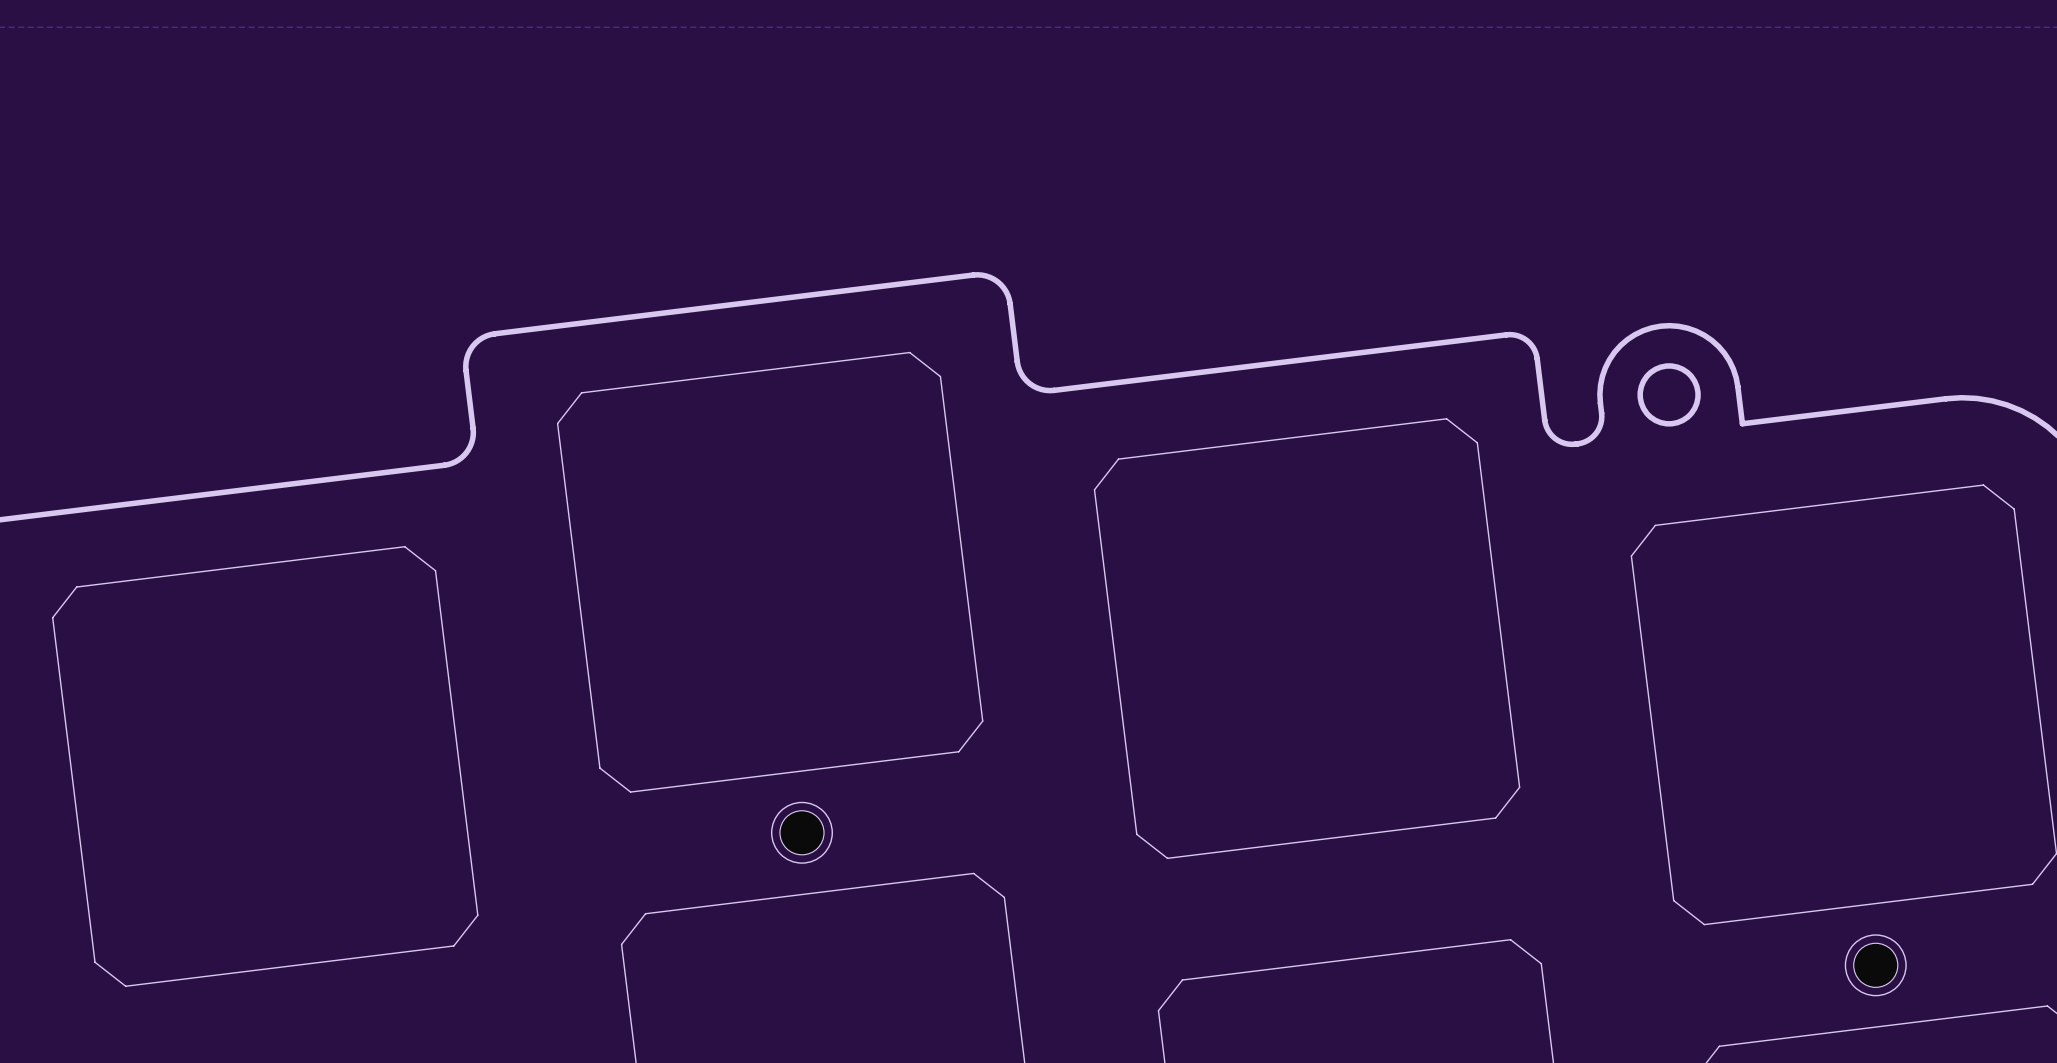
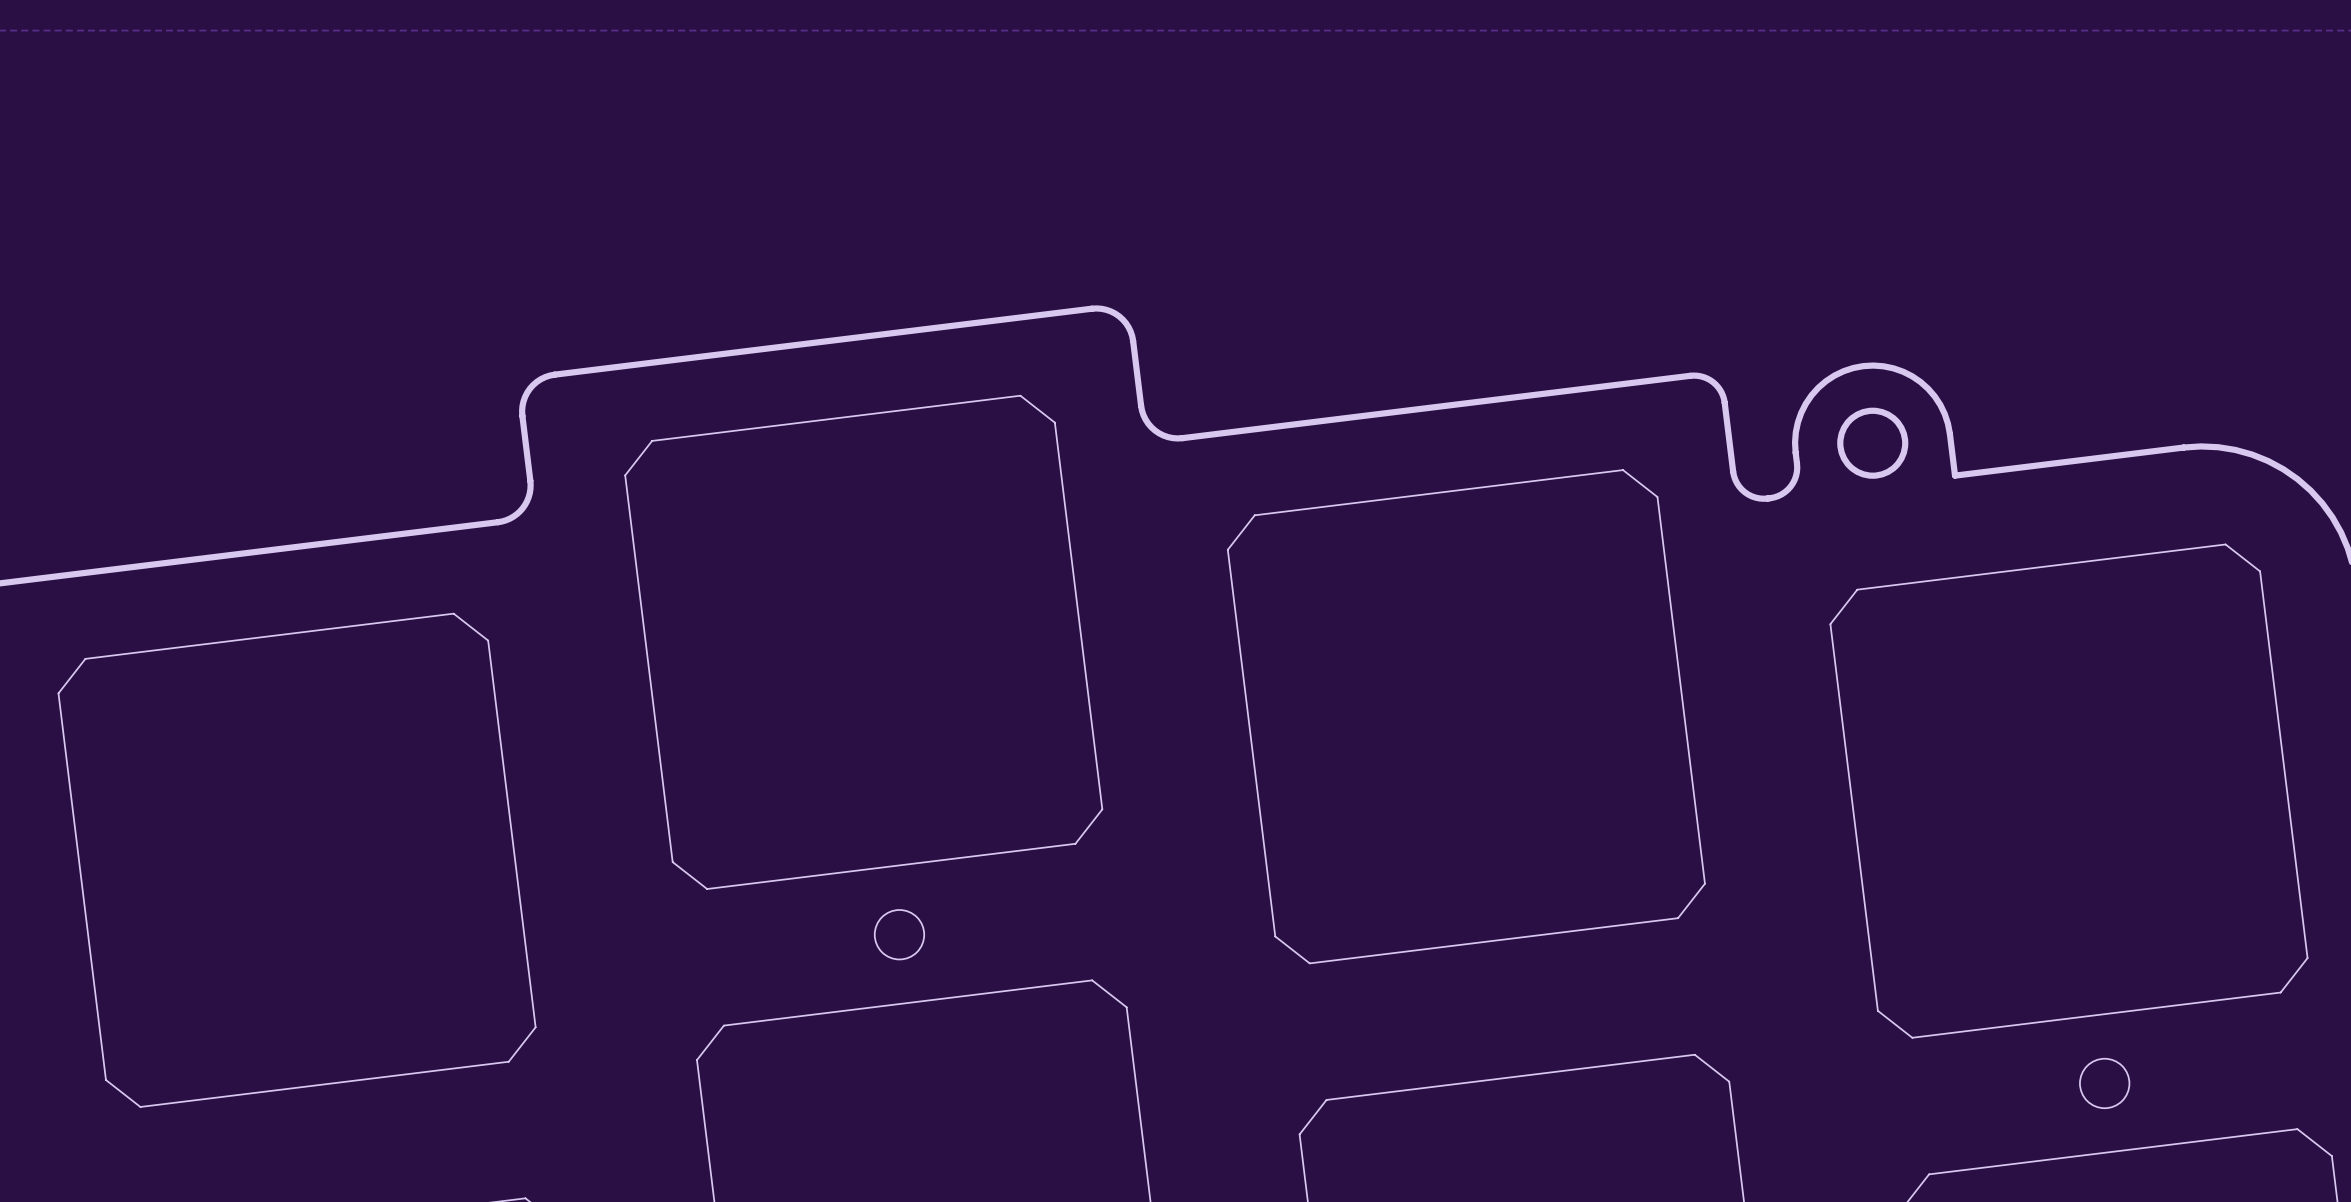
drawing: none -> [873, 909, 925, 961]
part: (801, 832) -> none
drawing: none -> [2079, 1057, 2131, 1109]
part: (1875, 965) -> none

